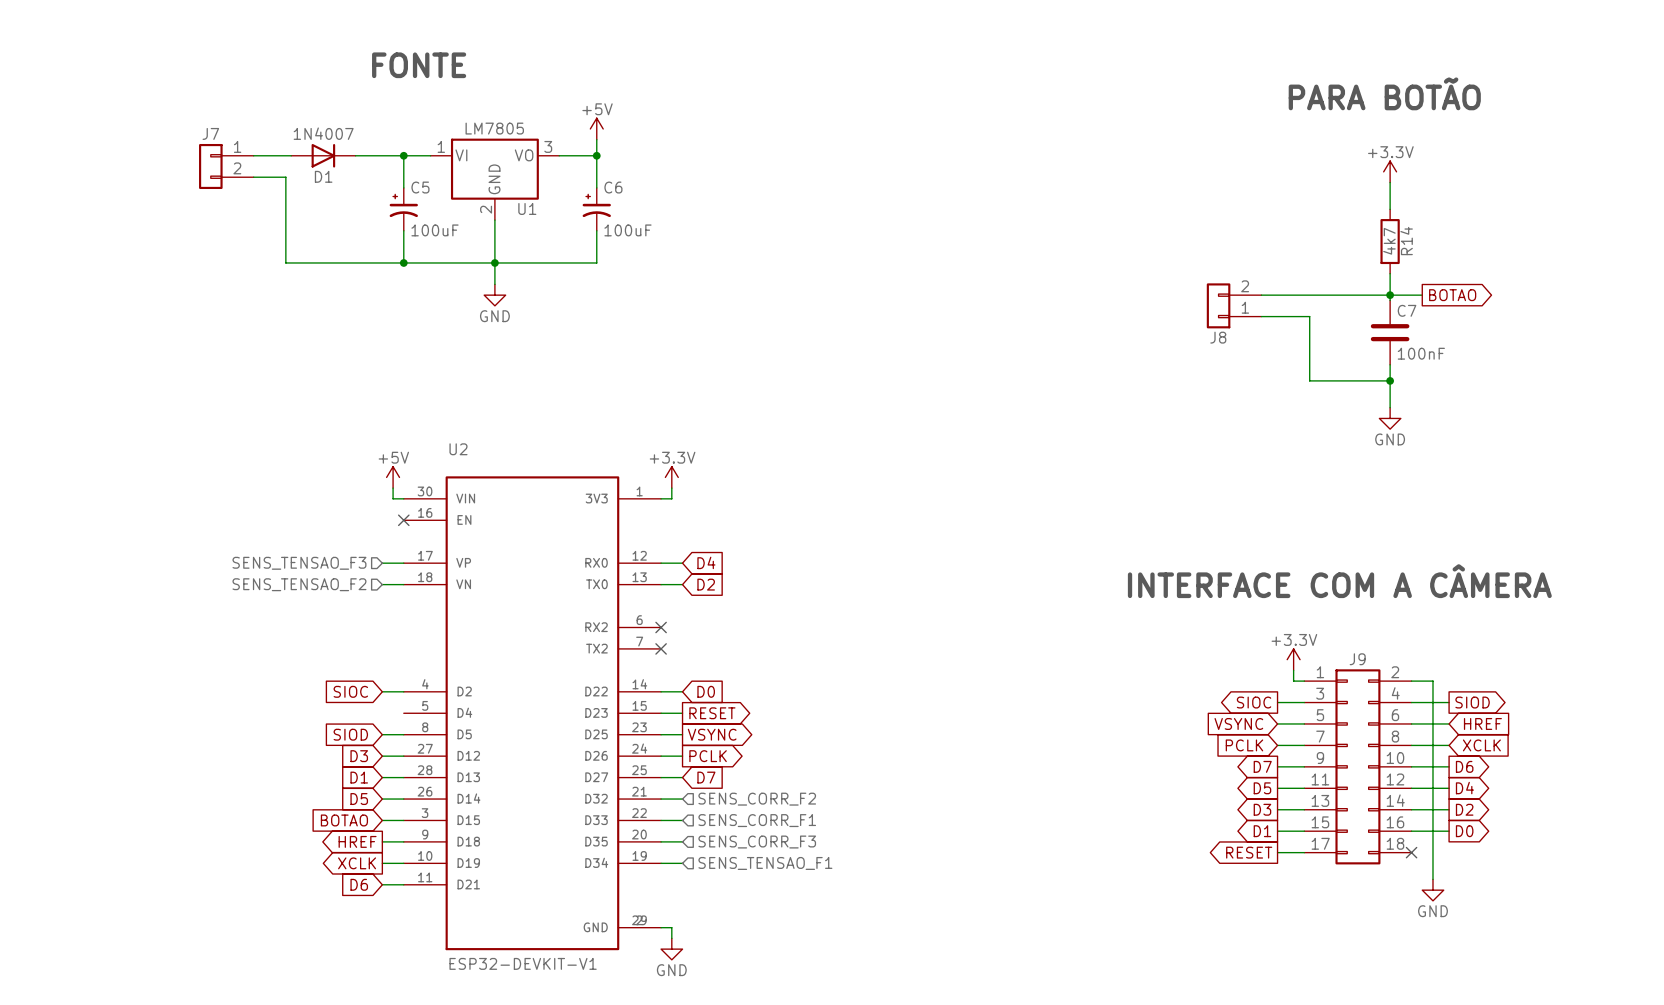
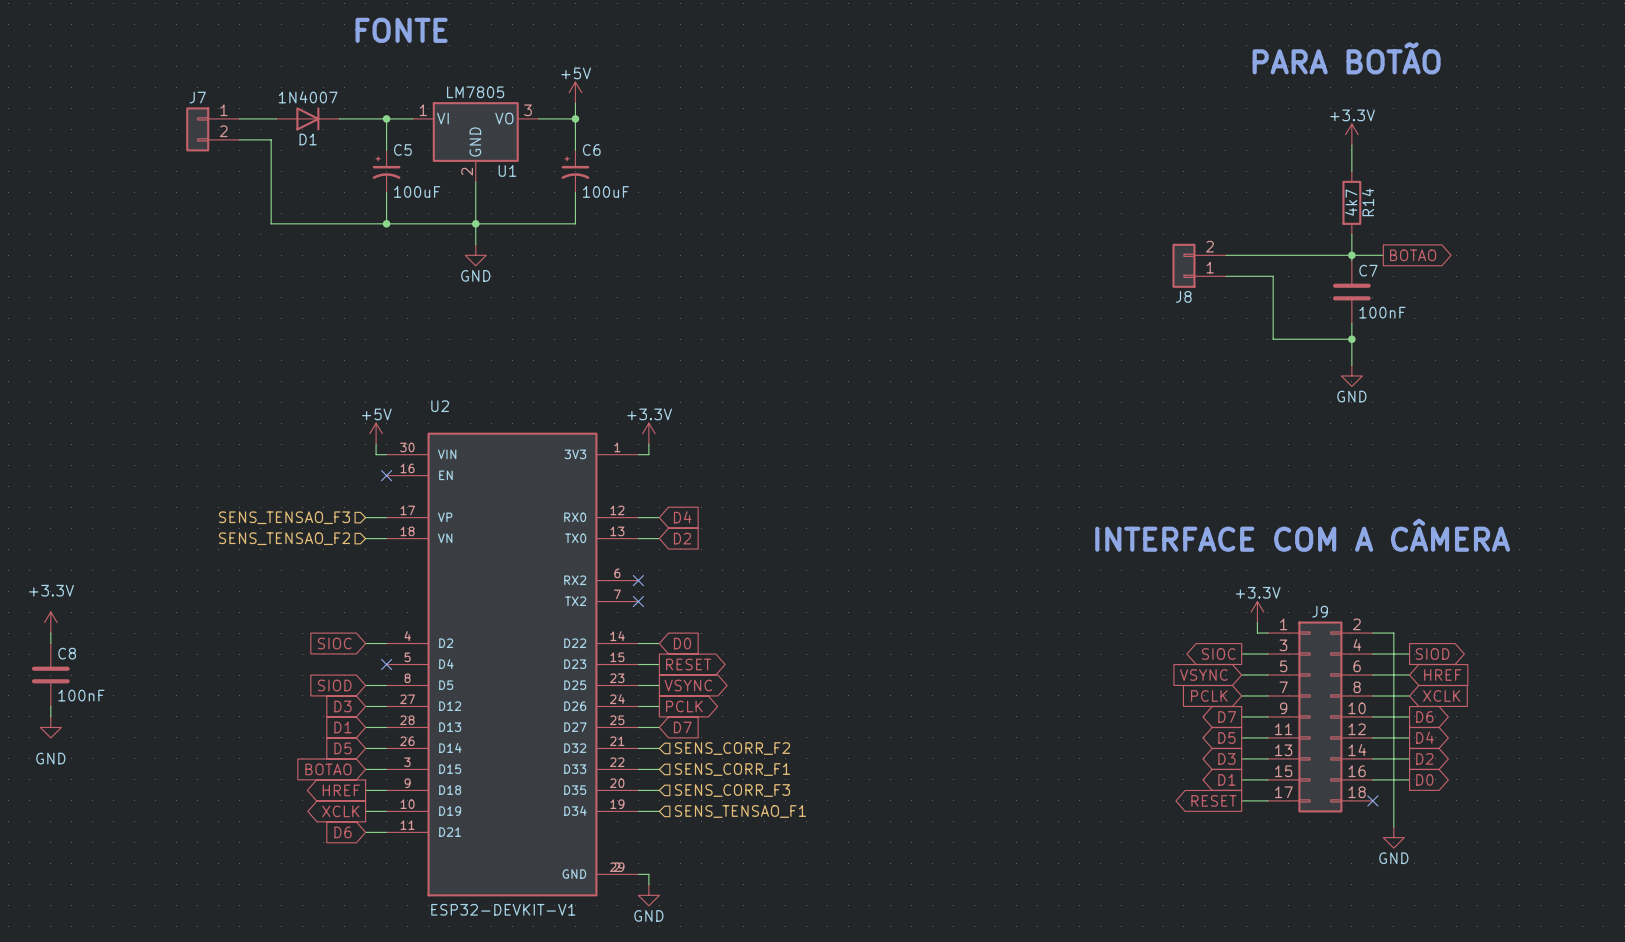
power symbol: none -> +3.3V (50, 622)
wire: none -> (50, 633) (50, 643)
no-connect mark: none -> (386, 664)
C8: none -> 100nF (50, 675)
wire: none -> (50, 706) (50, 716)
power symbol: none -> GND (50, 727)

